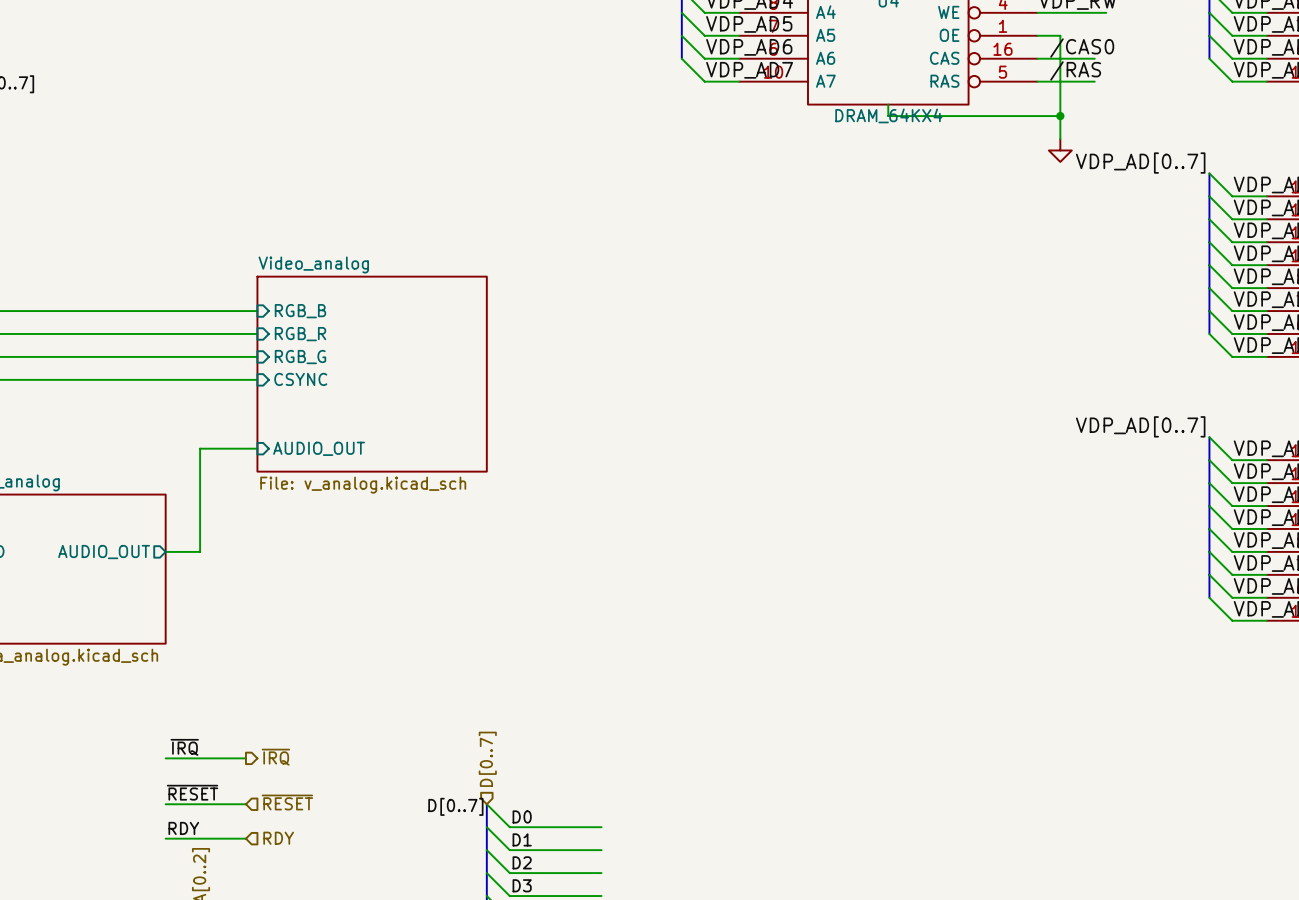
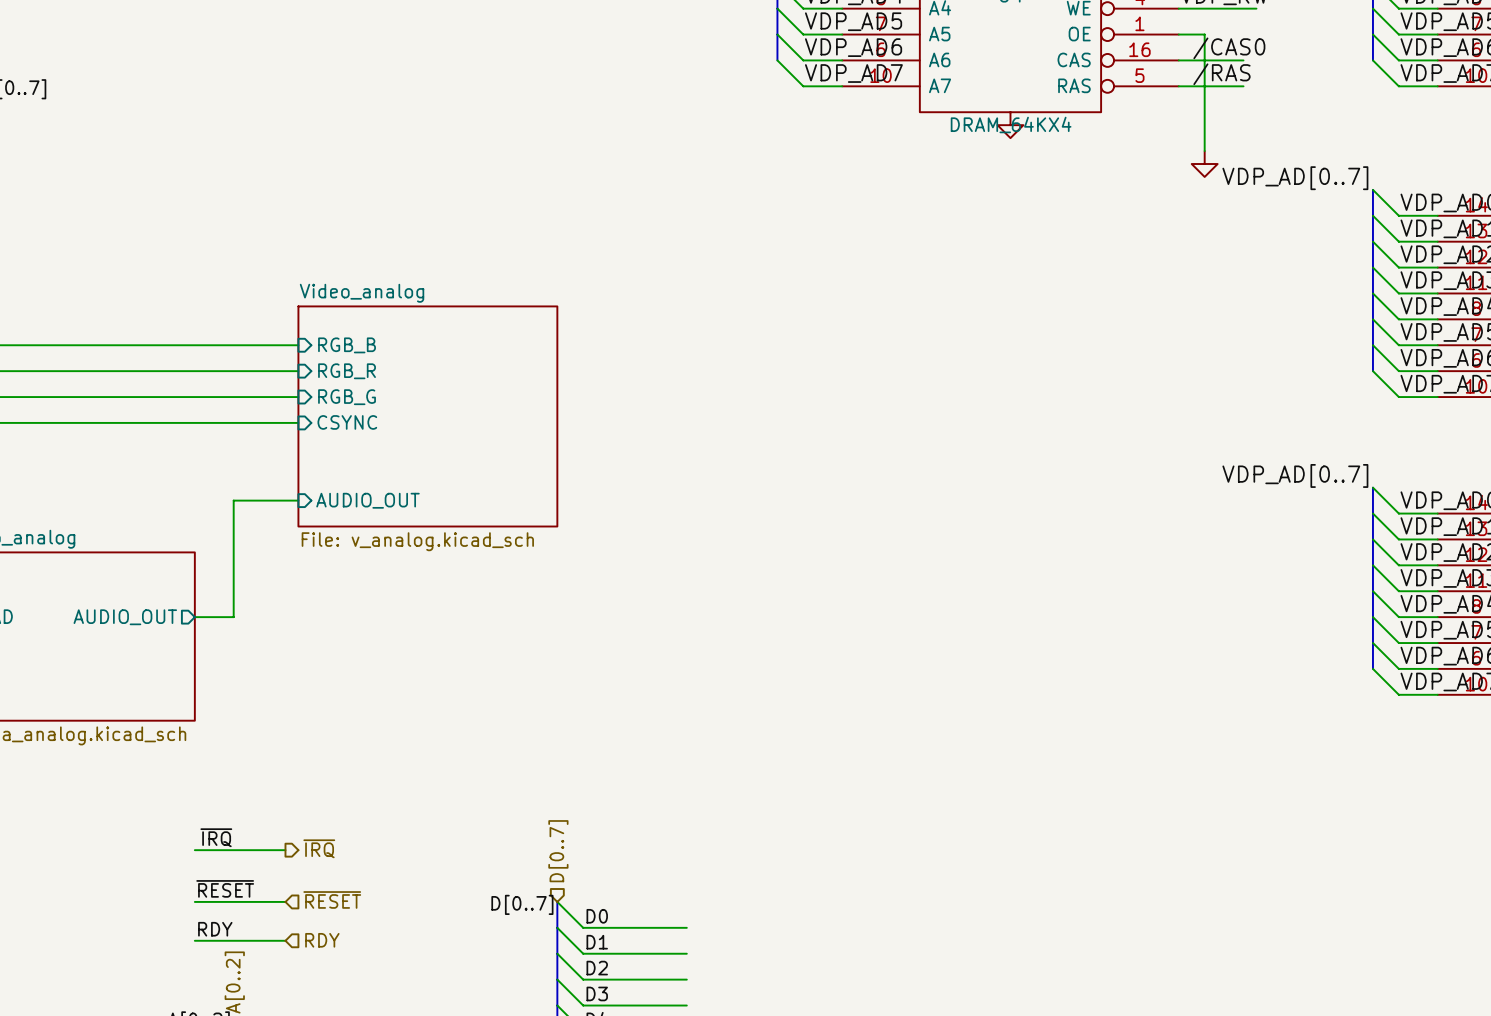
wire: (888, 104) (888, 116) (1060, 116) -> none
power symbol: none -> (1010, 125)
junction: (1060, 116) -> none

